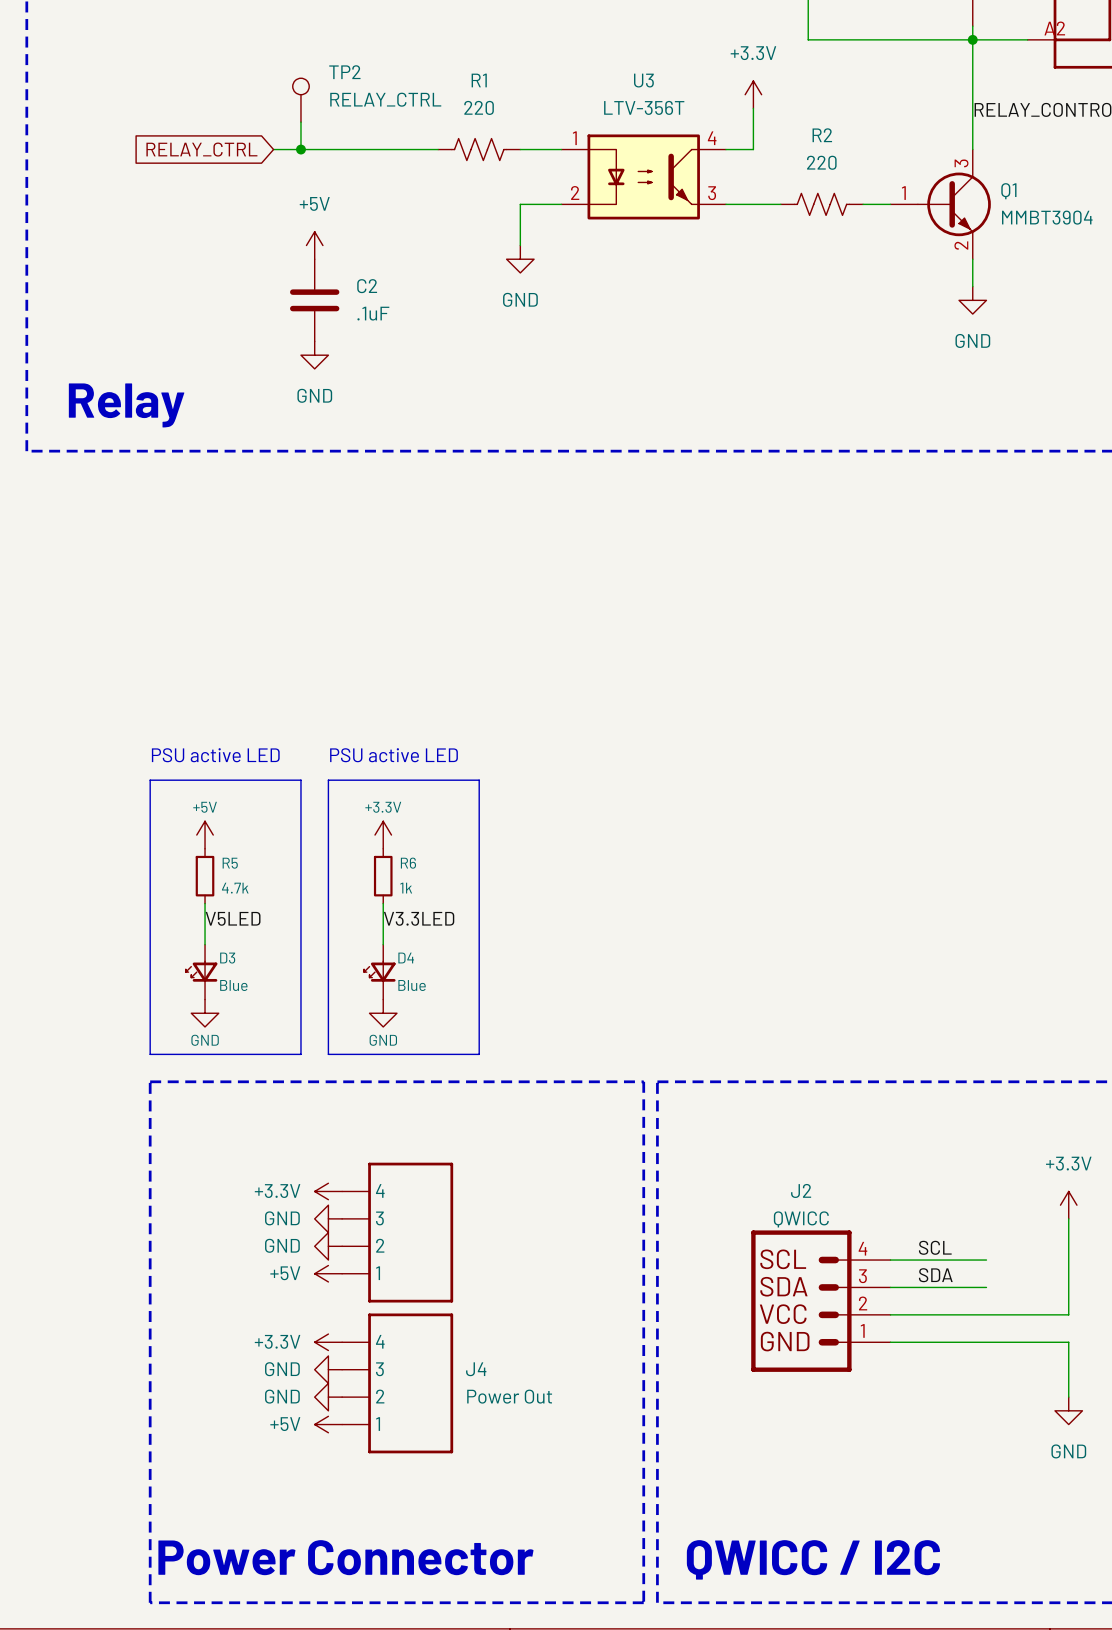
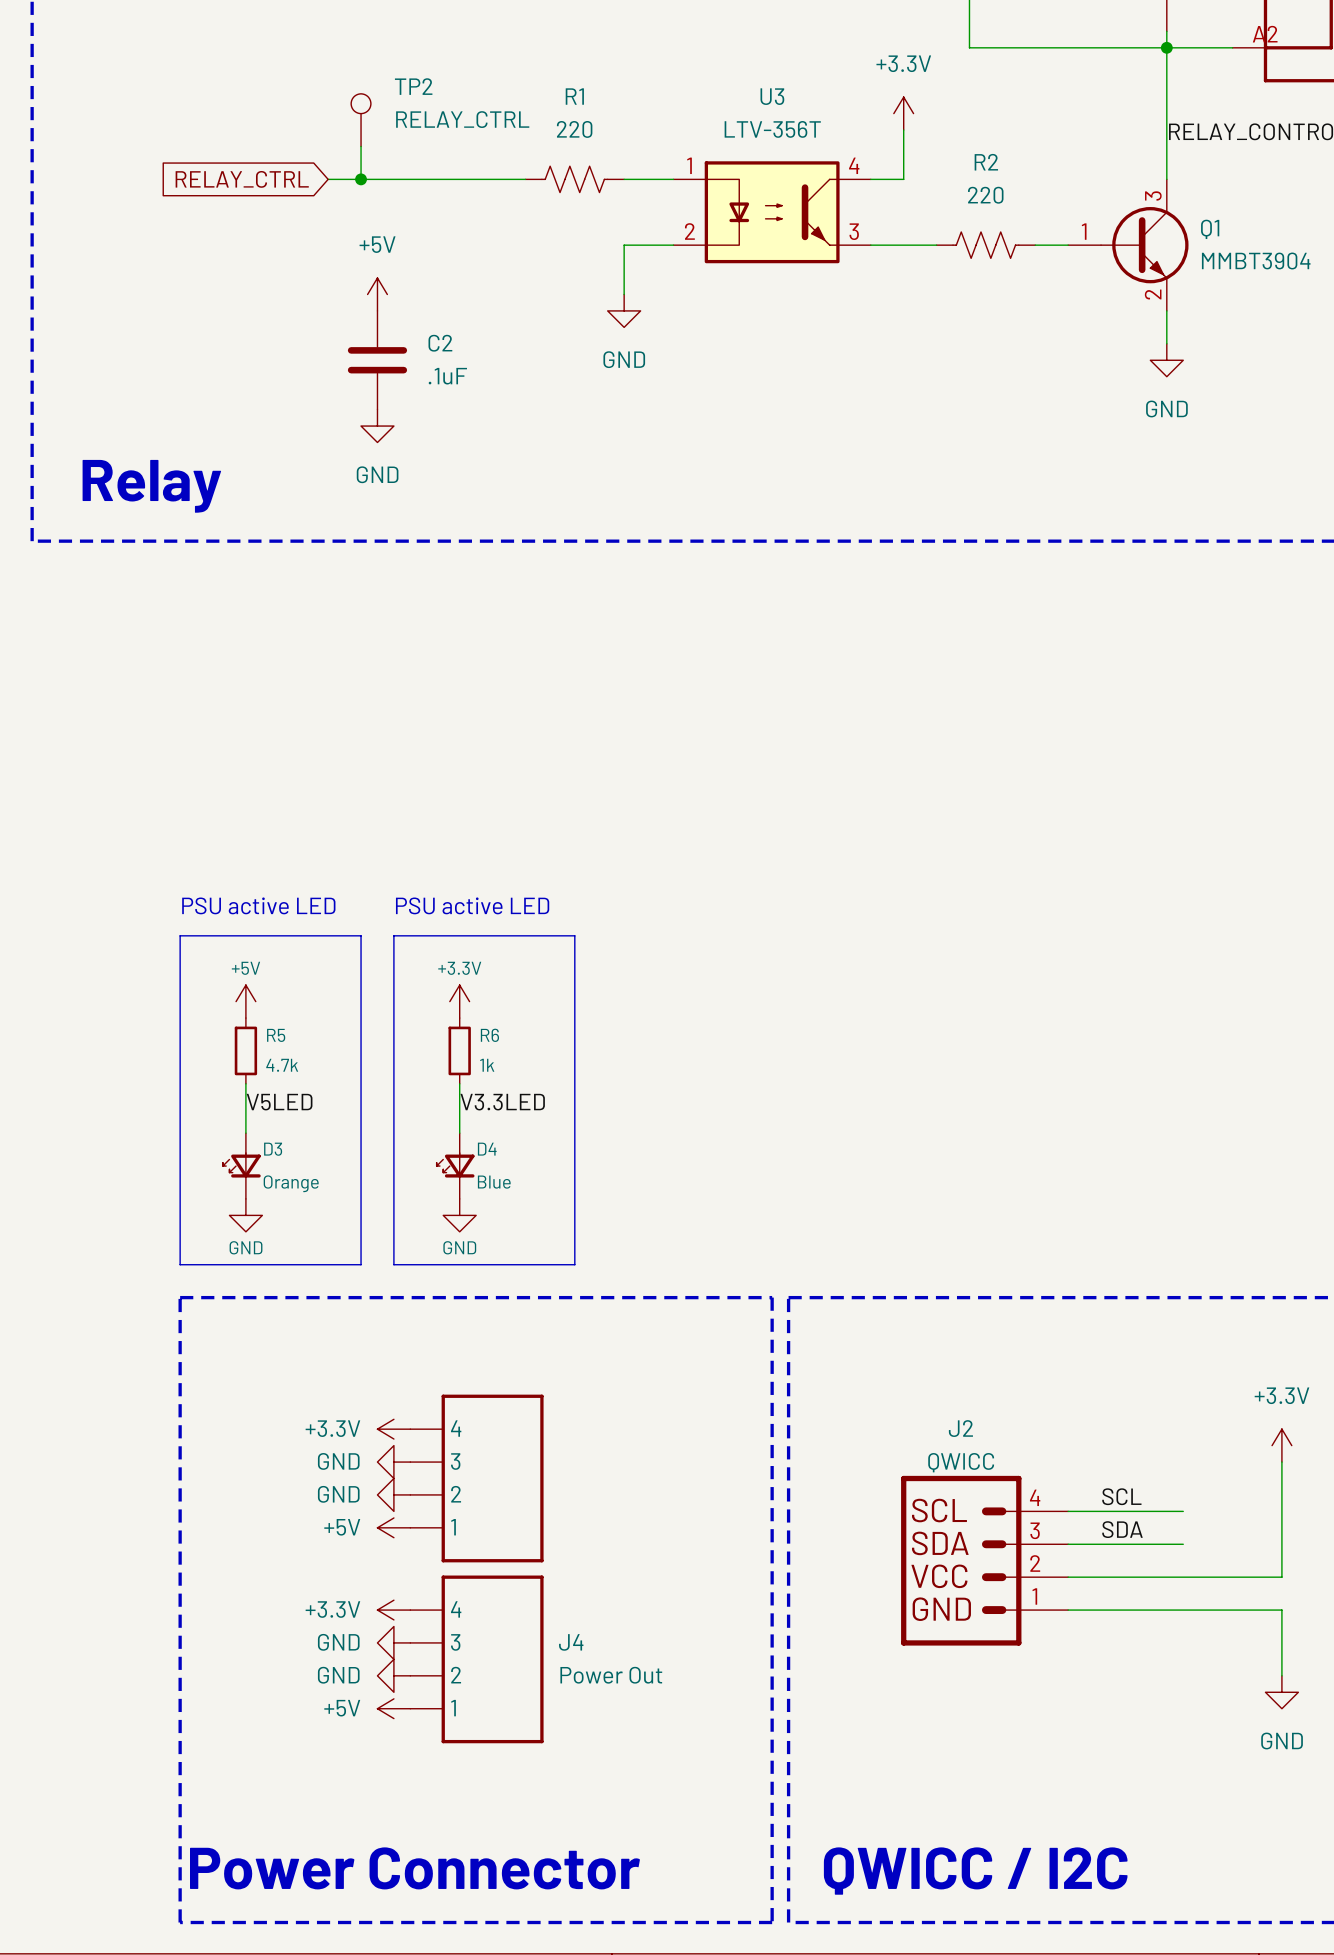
D3 value: Blue (233, 985) -> Orange (291, 1183)

